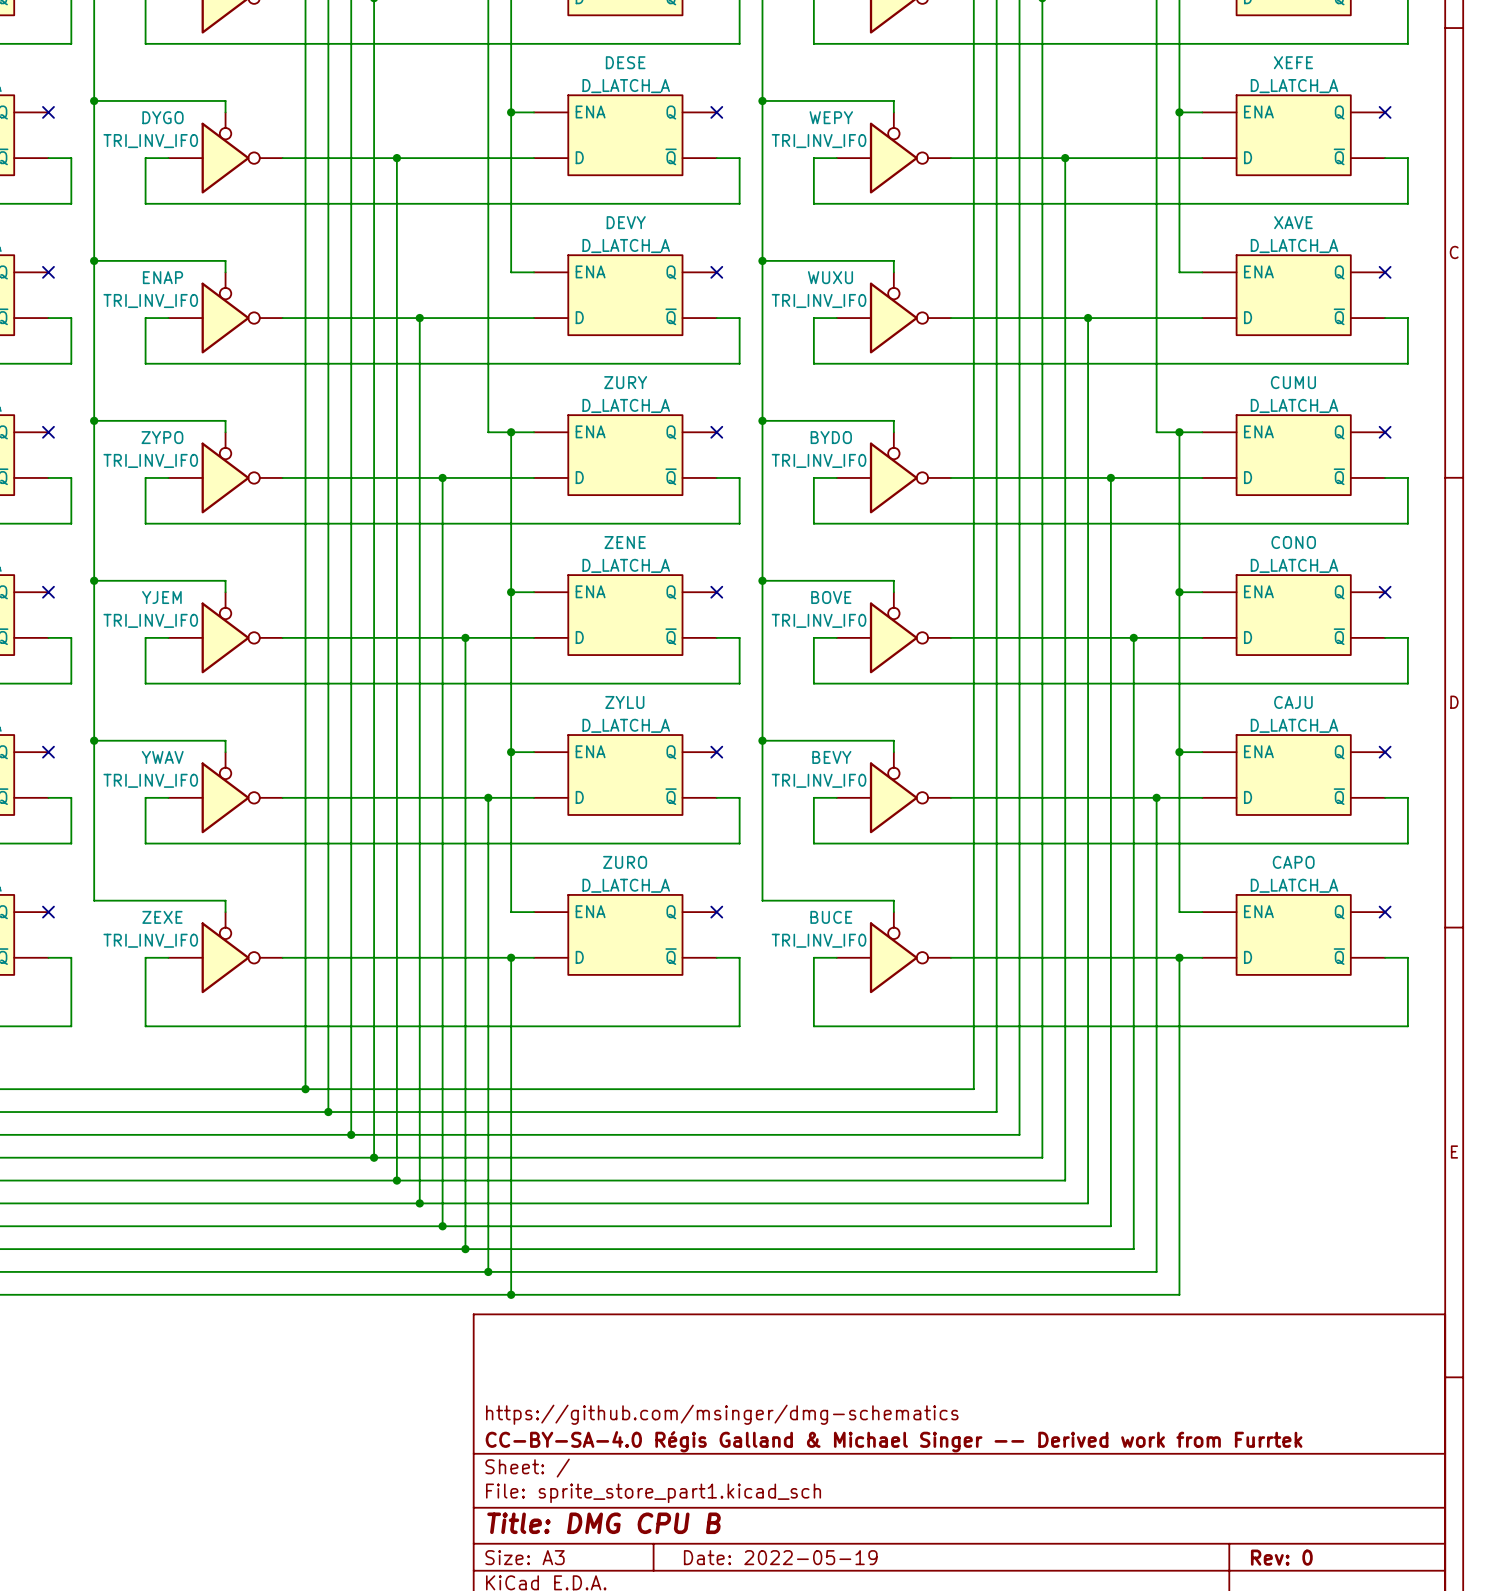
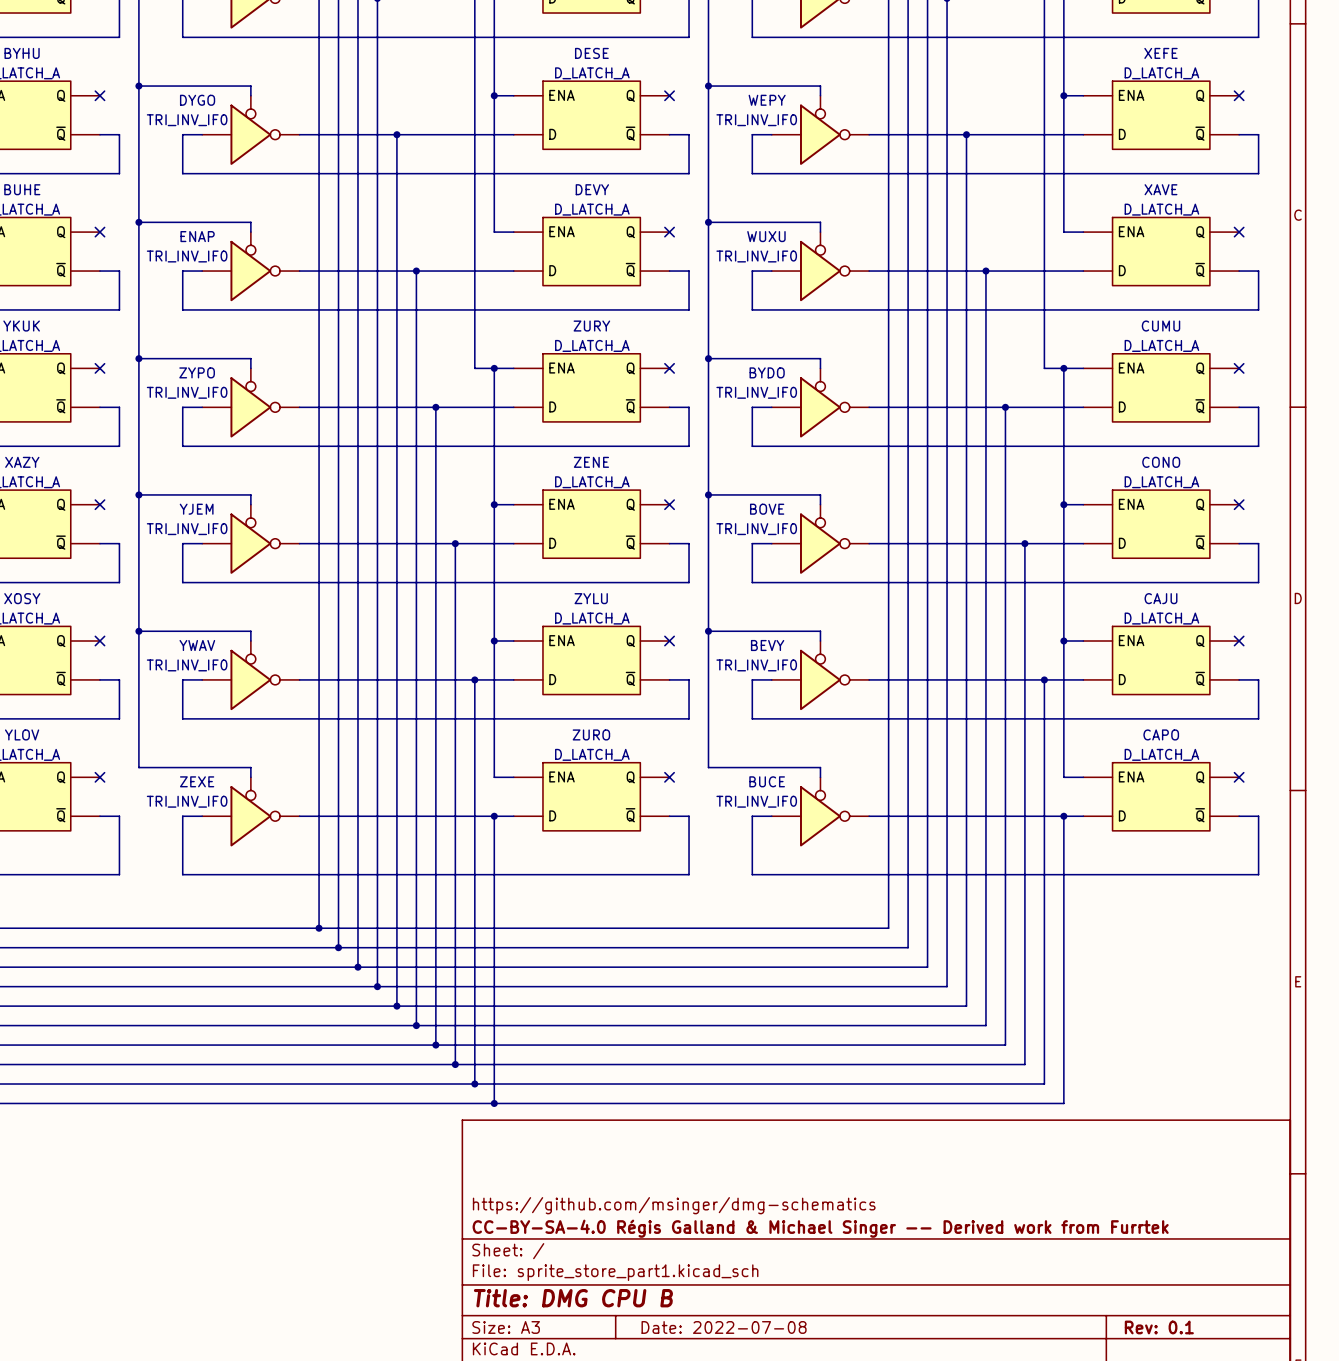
title block: Date: 2022-05-19 (780, 1557) -> Date: 2022-07-08 (724, 1327)
title block: Rev: 0 (1281, 1557) -> Rev: 0.1 (1159, 1327)

